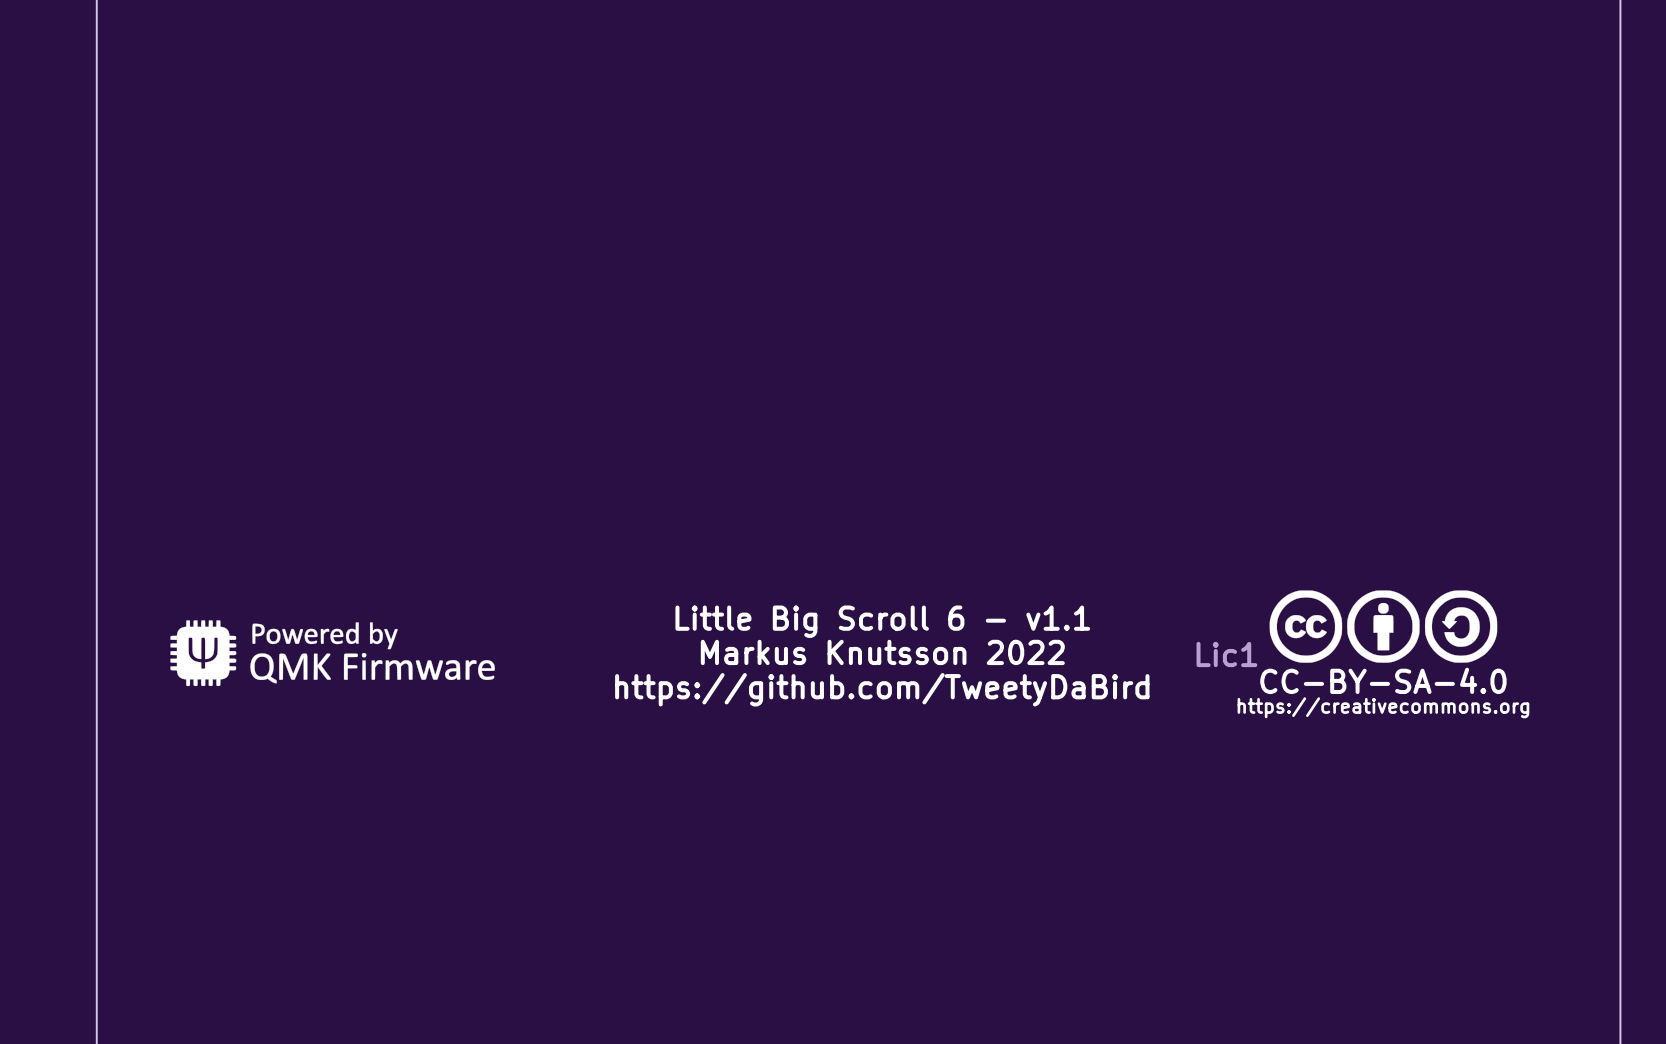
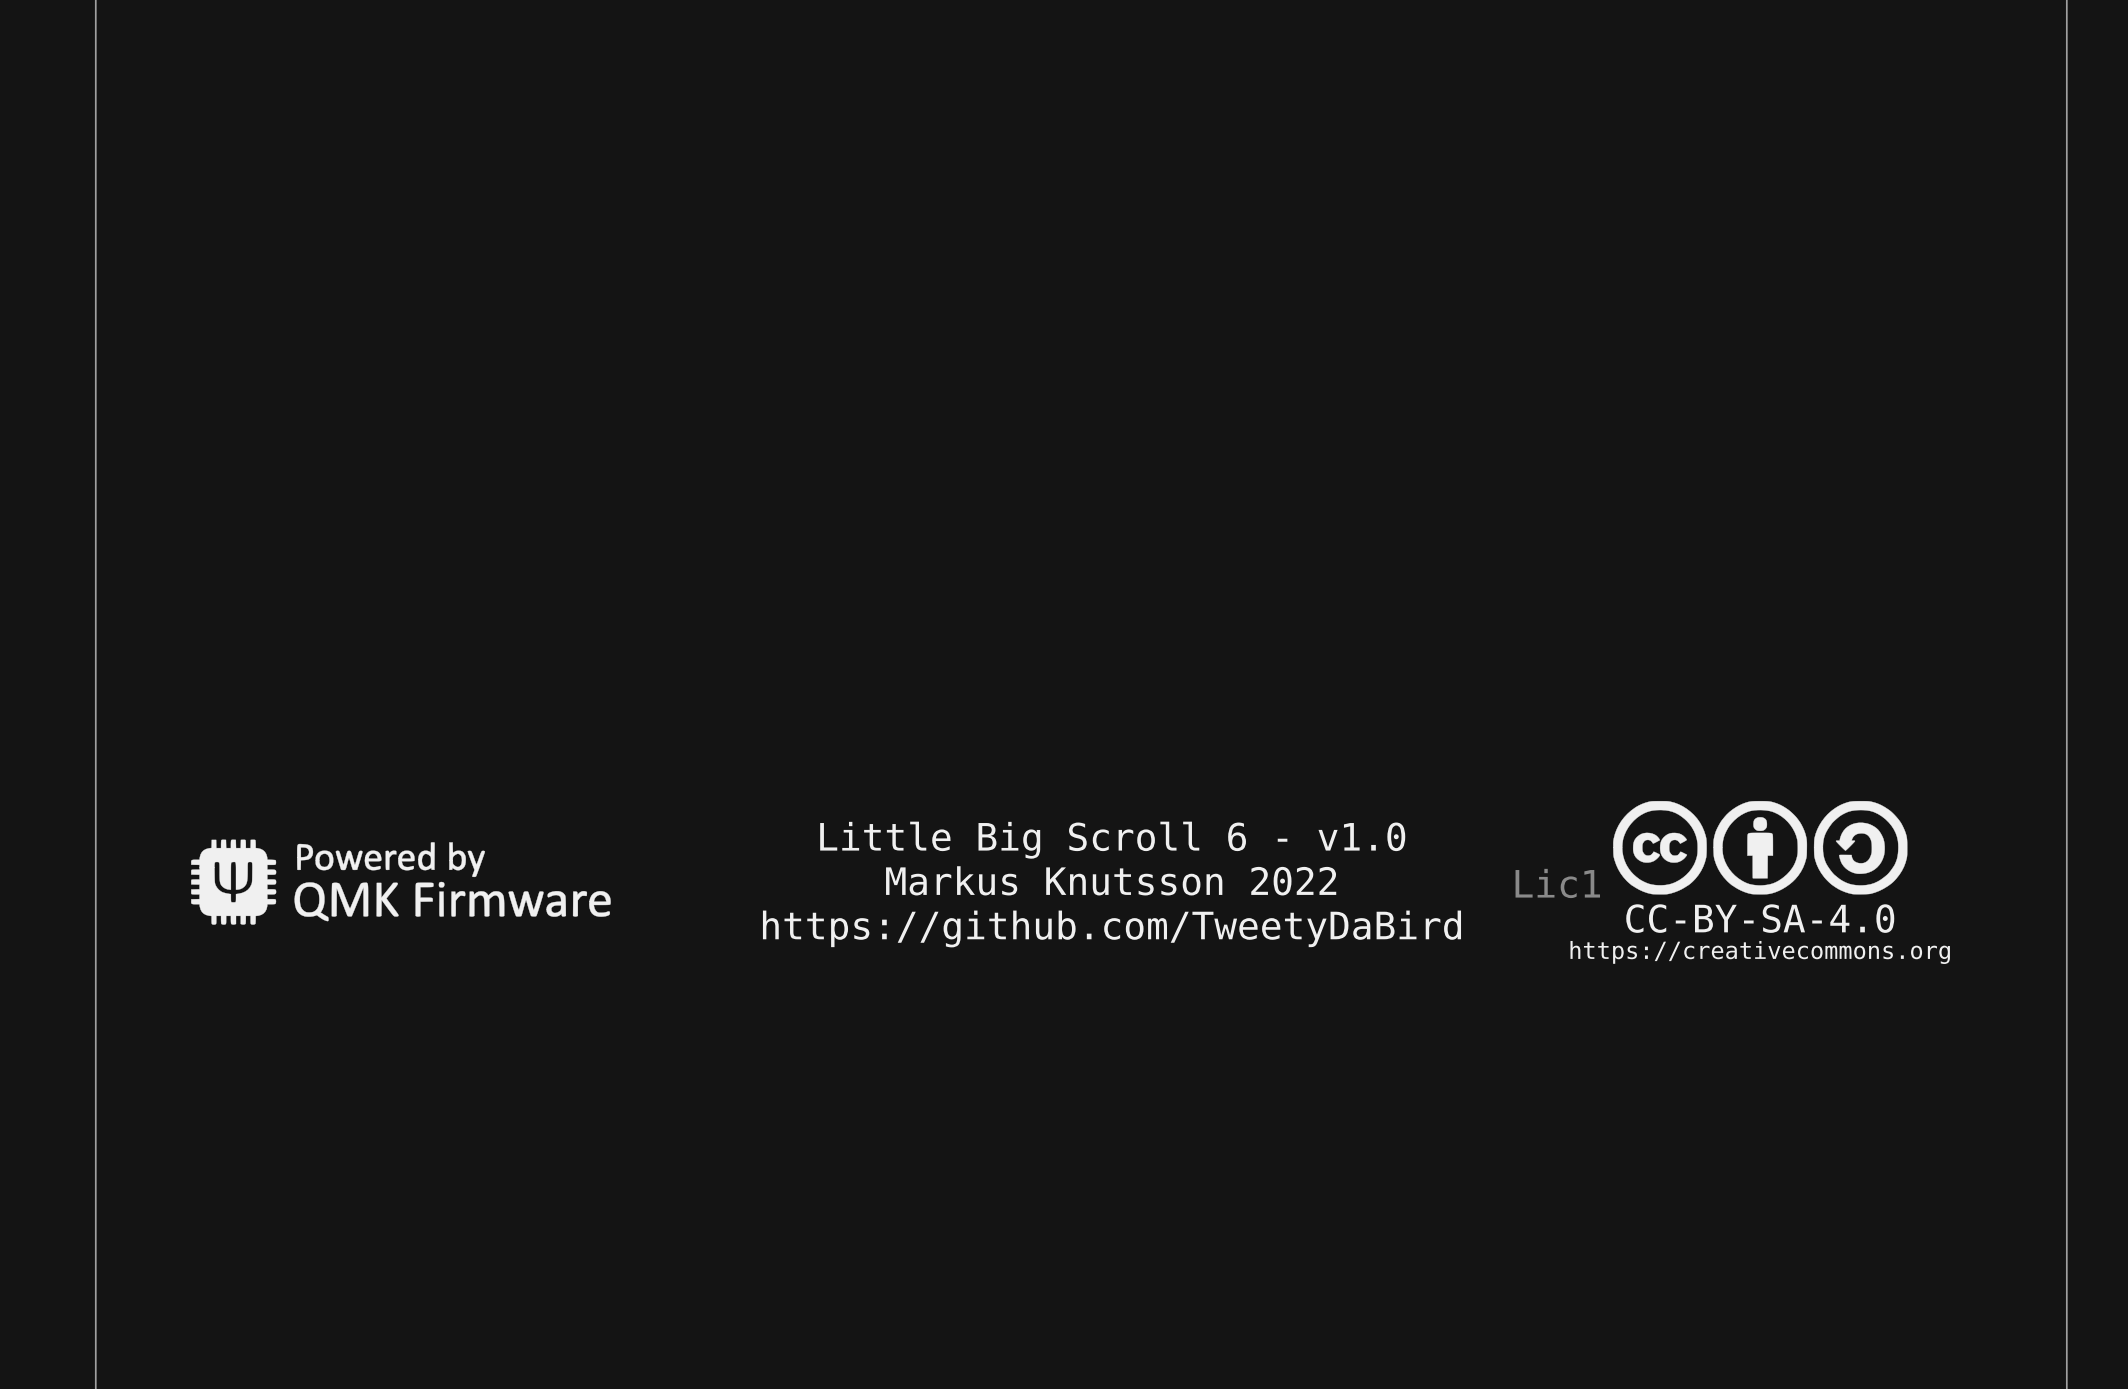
text: Little Big Scroll 6 - v1.1 (882, 621) -> Little Big Scroll 6 - v1.0 (1112, 840)

